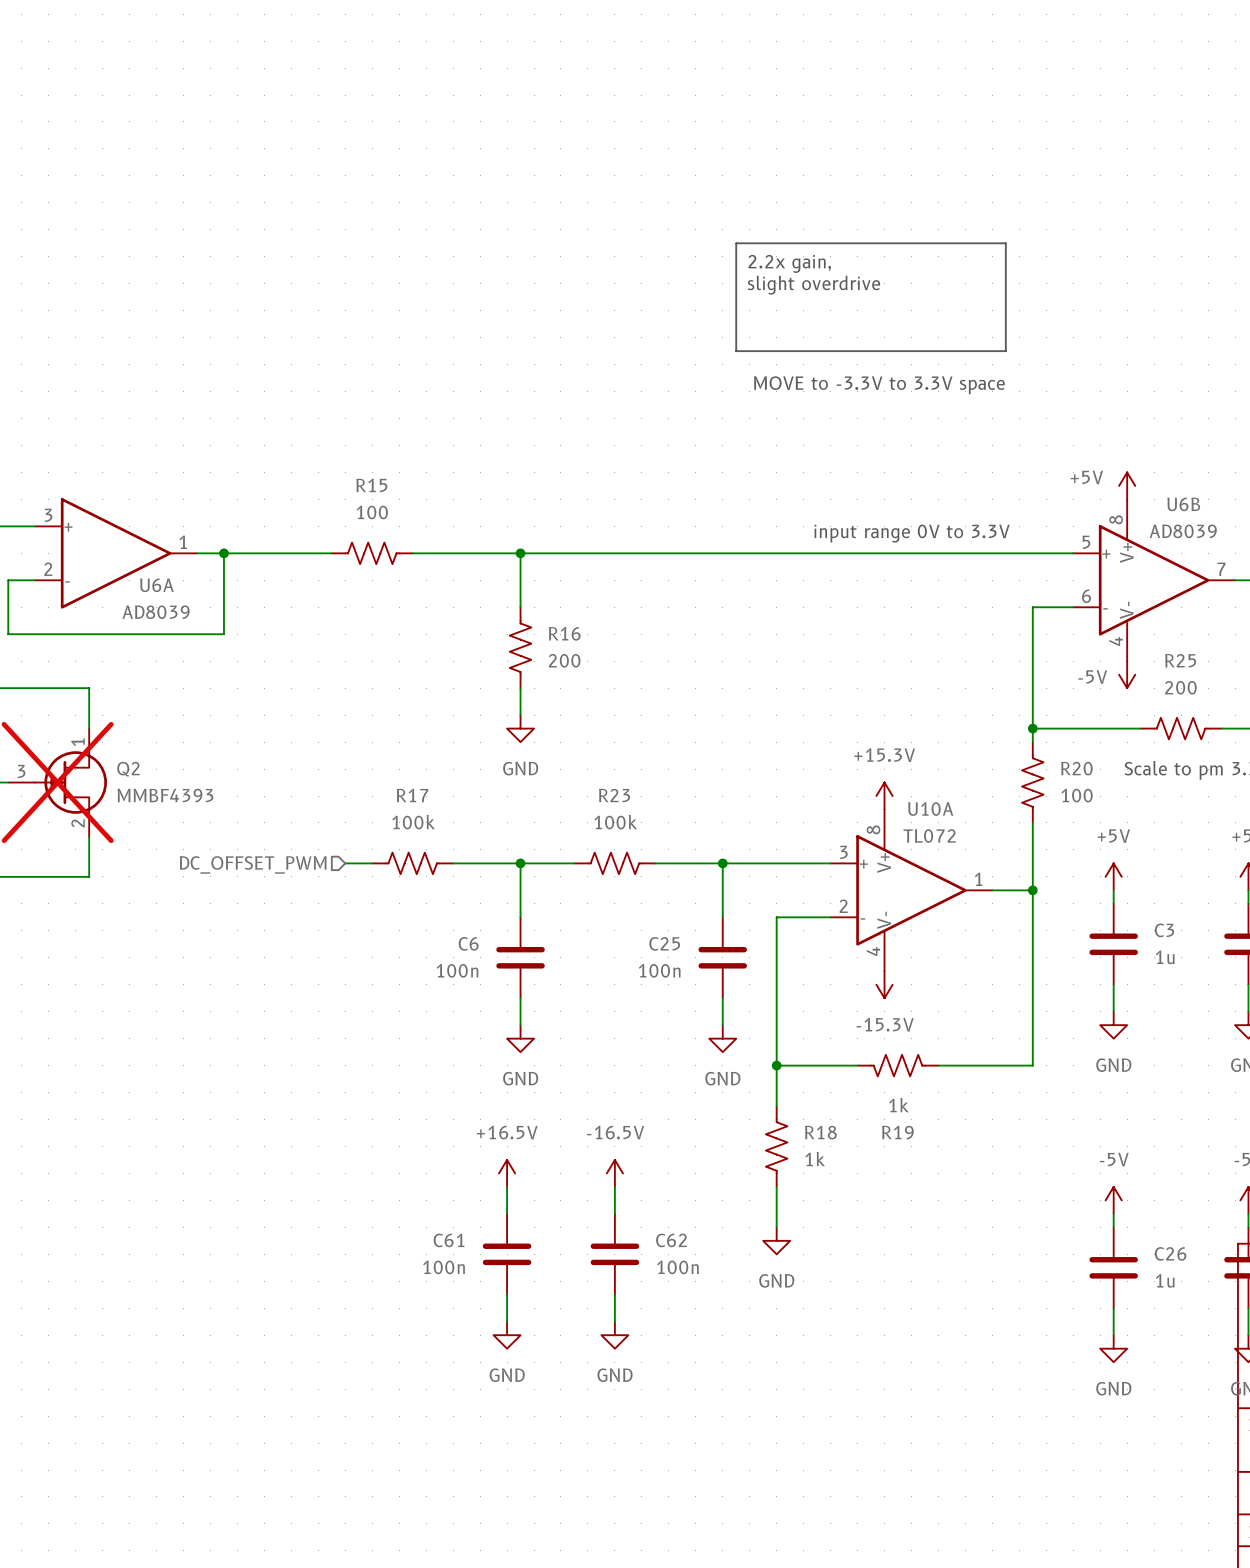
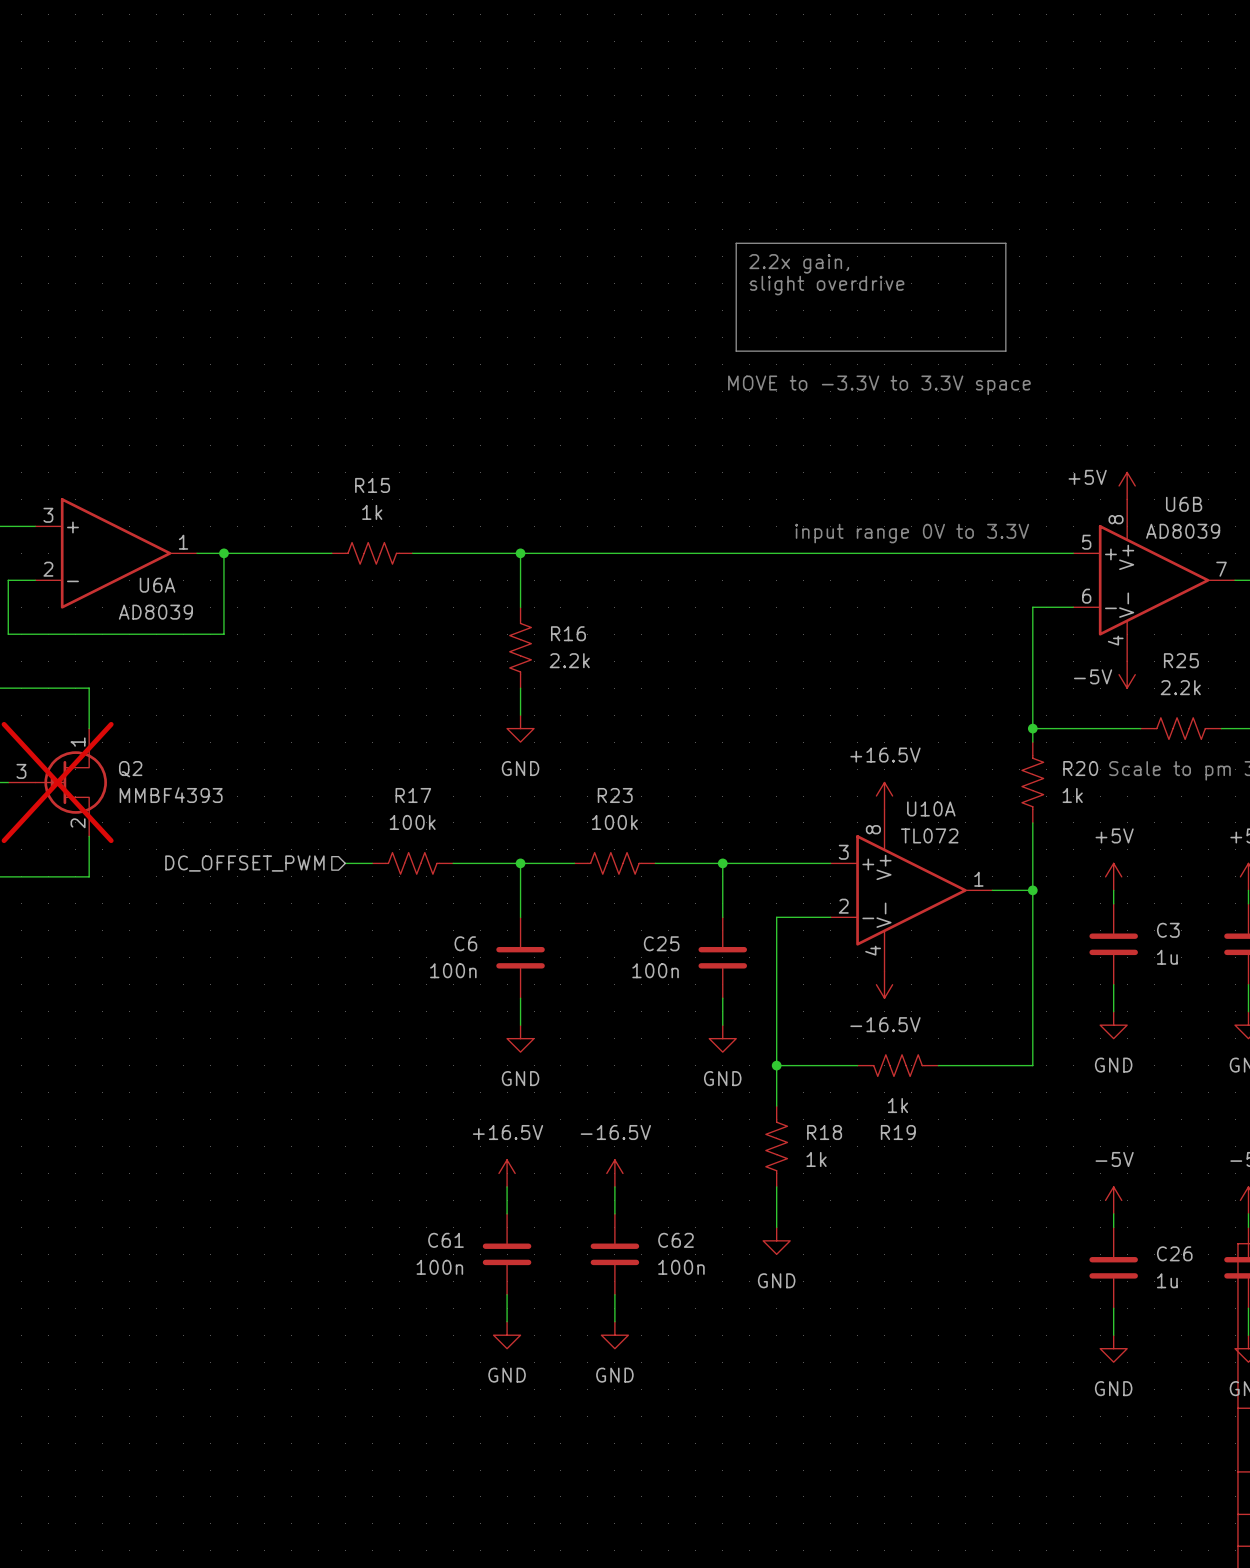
R15 value: 100 (372, 512) -> 1k (372, 512)
R16 value: 200 (564, 660) -> 2.2k (569, 660)
R25 value: 200 (1180, 687) -> 2.2k (1180, 687)
R20 value: 100 (1077, 795) -> 1k (1072, 795)
power symbol: +15.3V (884, 796) -> +16.5V (884, 796)
power symbol: -15.3V (884, 984) -> -16.5V (884, 984)

